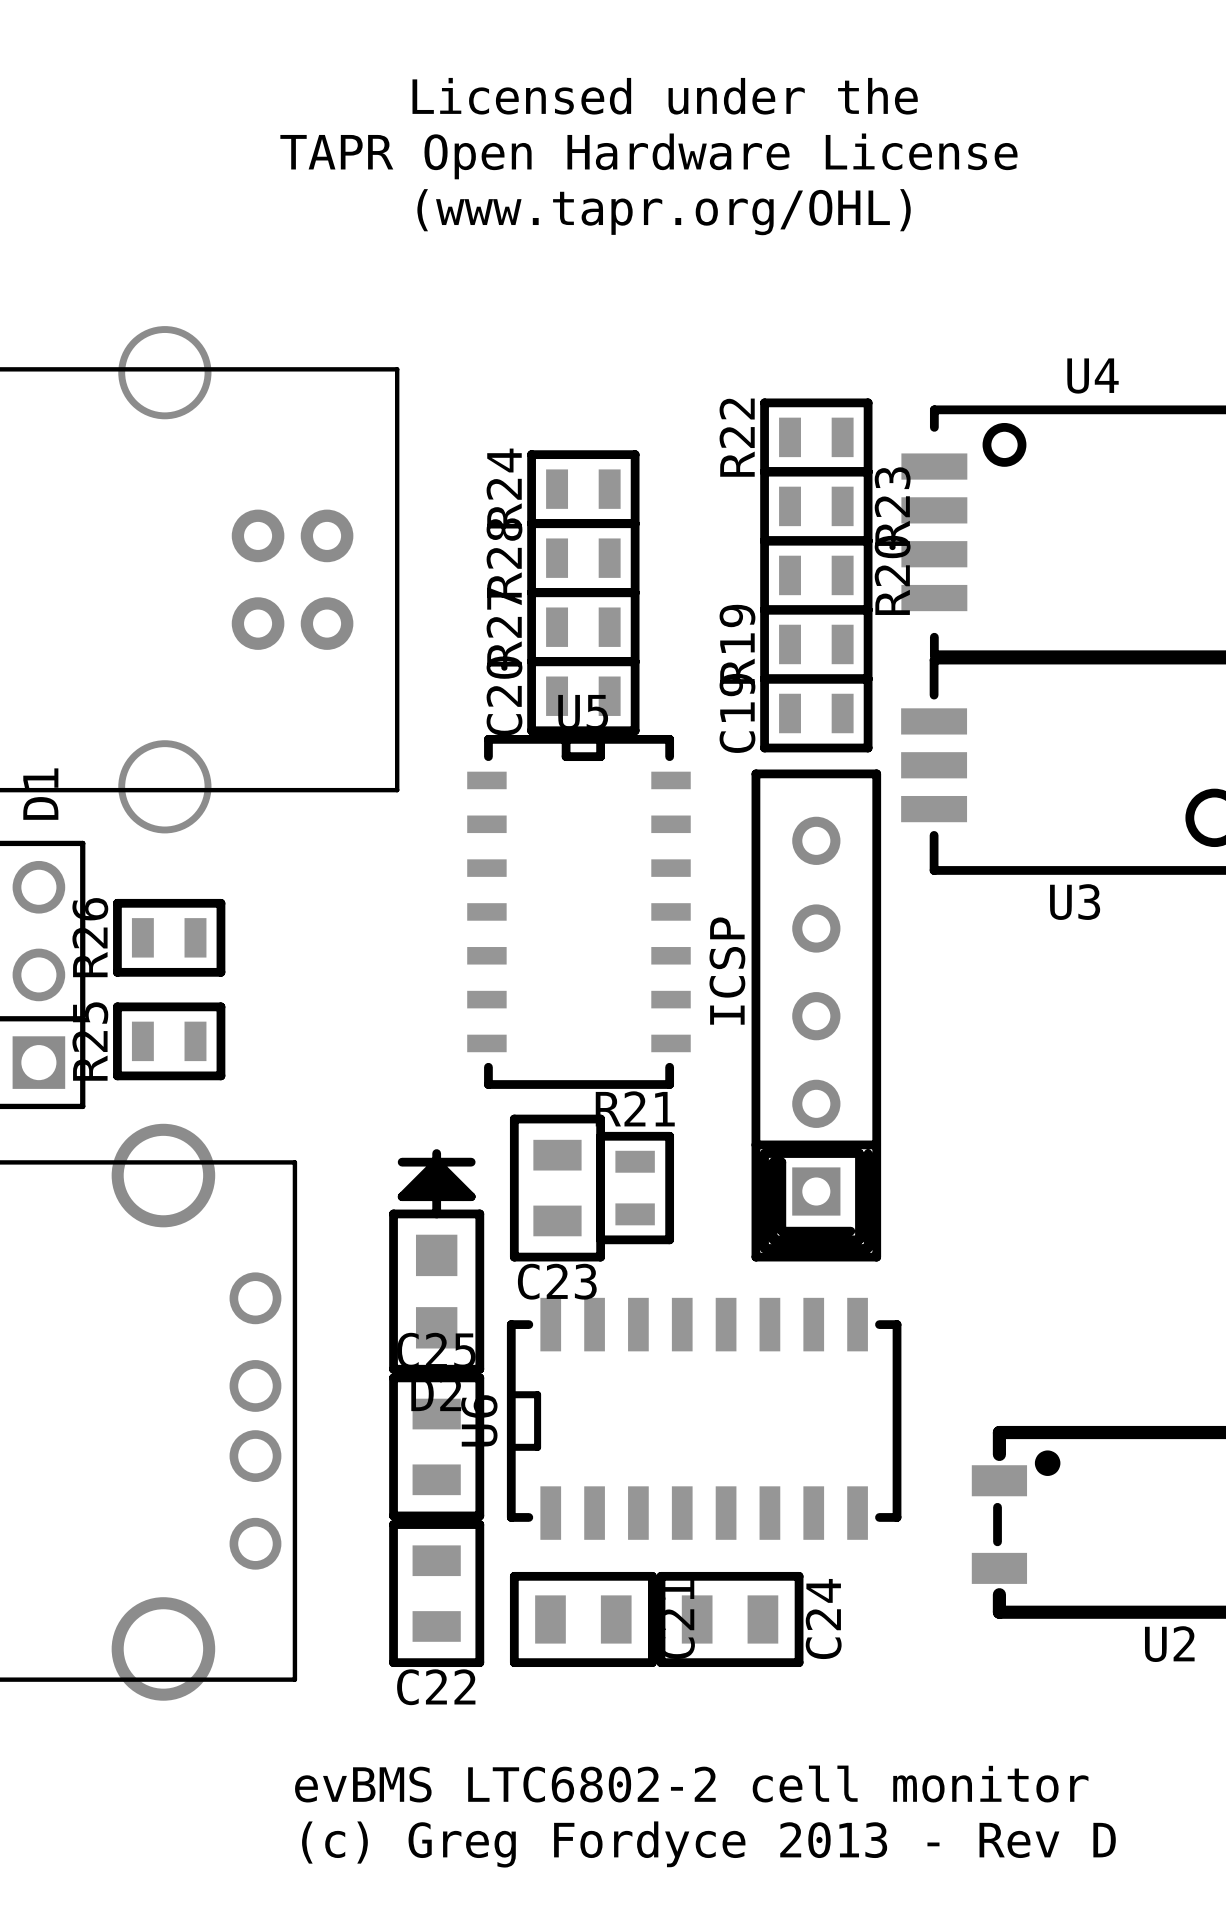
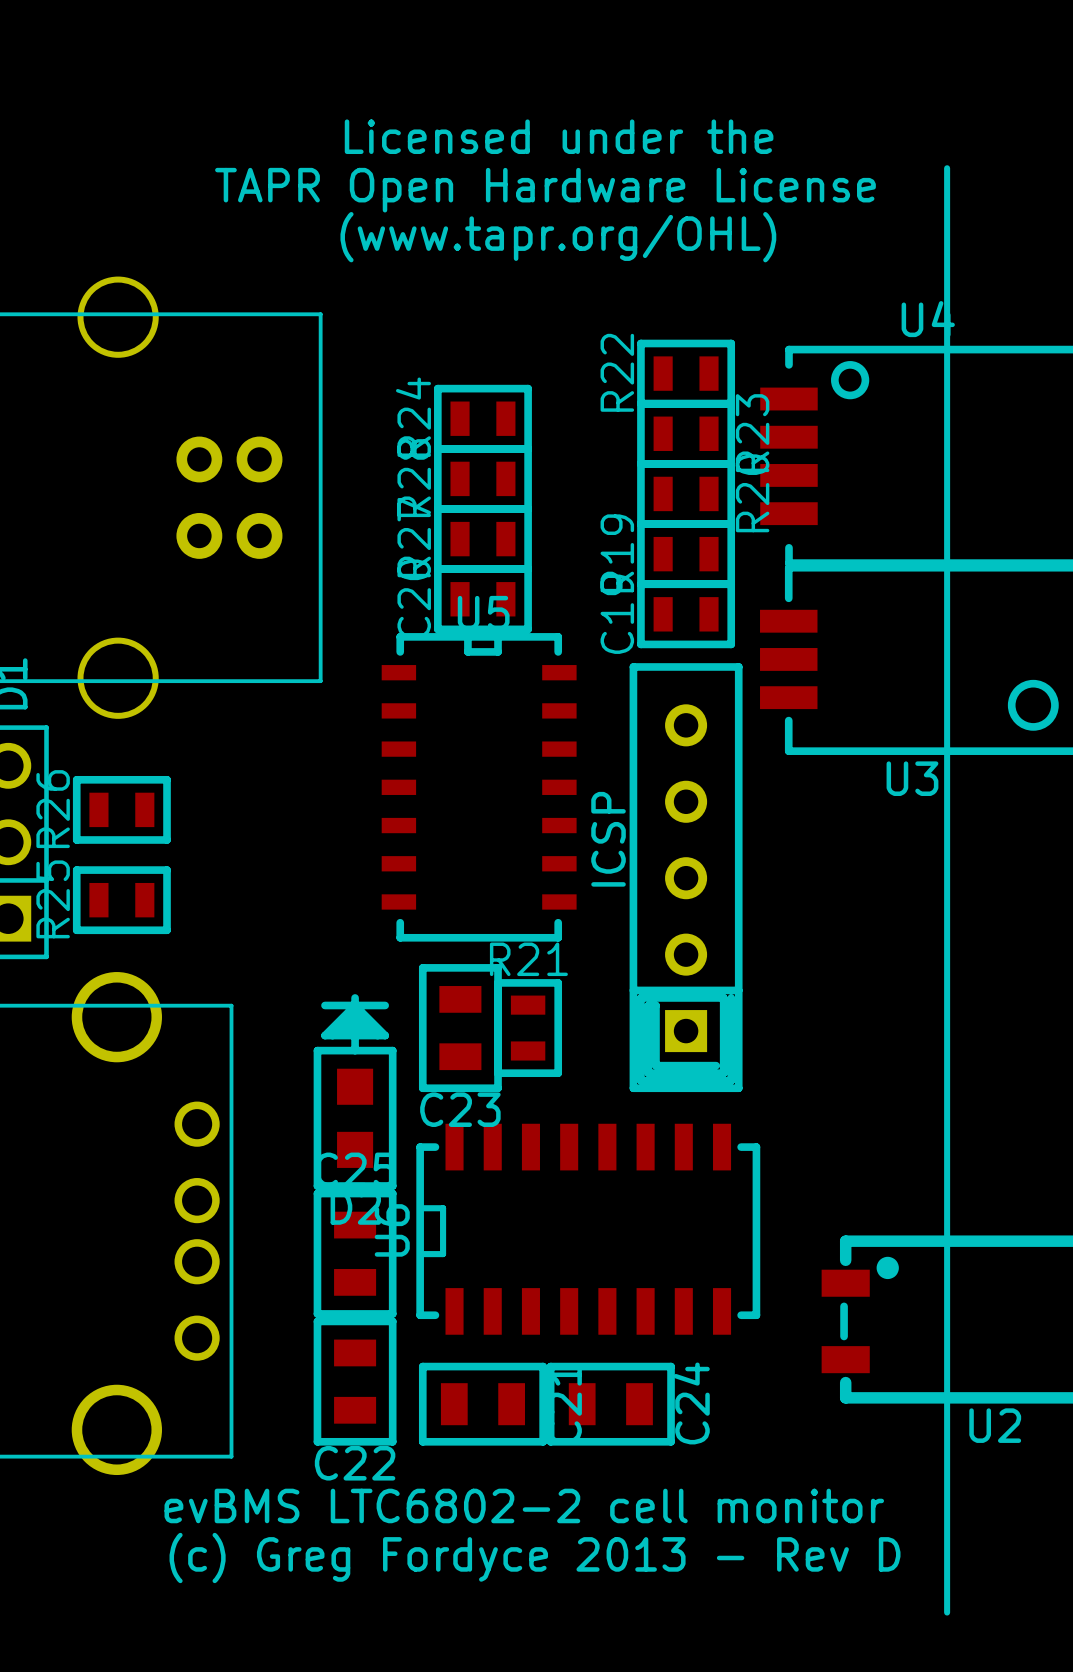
text: Licensed under the (665, 96) -> none
text: TAPR Open Hardware License (648, 156) -> Licensed under the (559, 136)
line: none -> (947, 168) (947, 1612)
text: (www.tapr.org/OHL) (664, 212) -> TAPR Open Hardware License (545, 190)
text: none -> (www.tapr.org/OHL) (558, 237)
text position: evBMS LTC6802-2 cell monitor (691, 1784) -> evBMS LTC6802-2 cell monitor (524, 1505)
text position: (c) Greg Fordyce 2013 - Rev D (708, 1844) -> (c) Greg Fordyce 2013 - Rev D (535, 1557)

